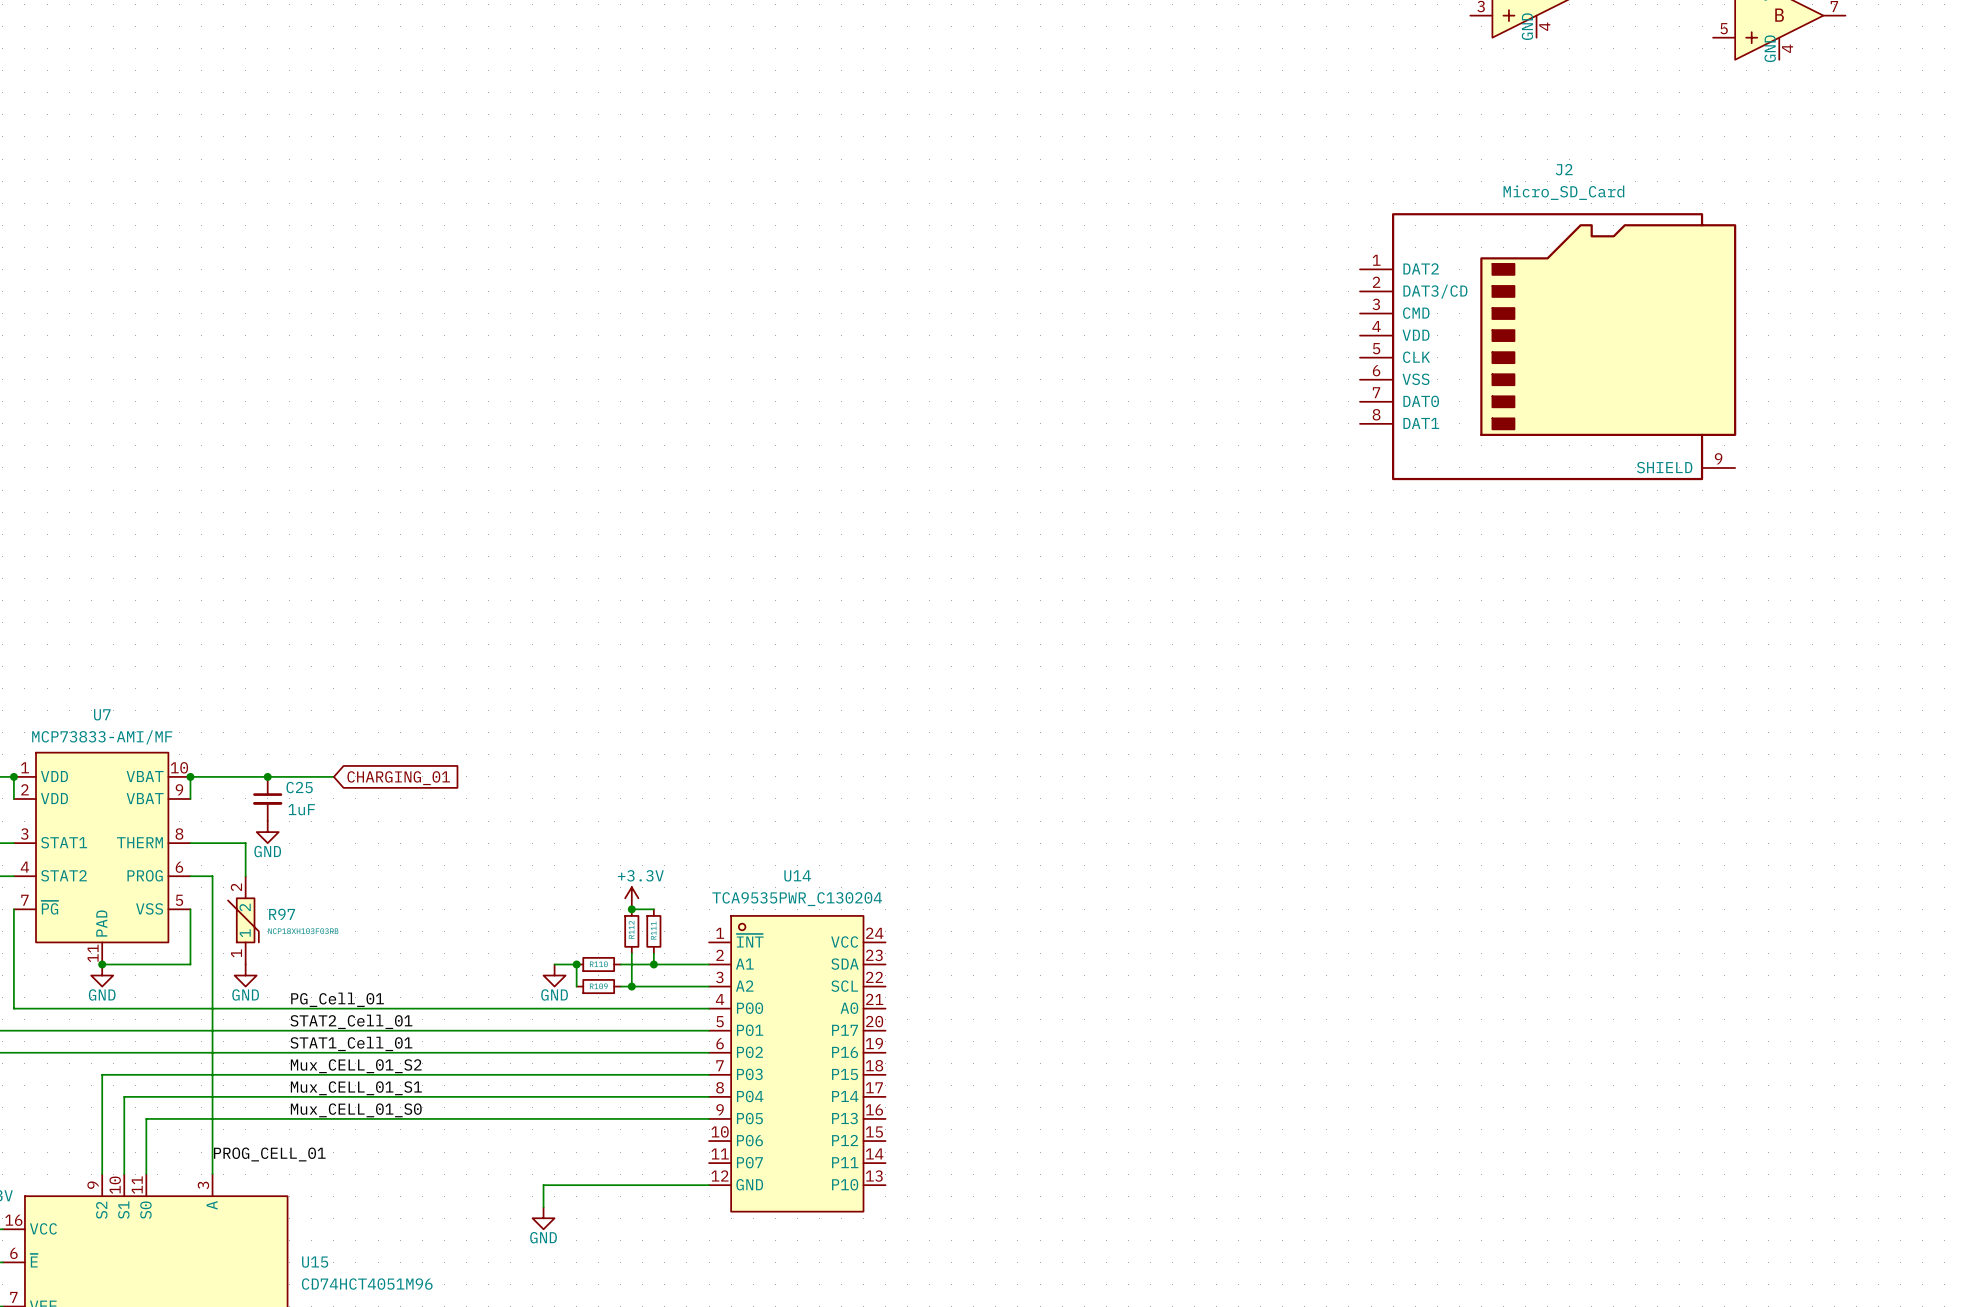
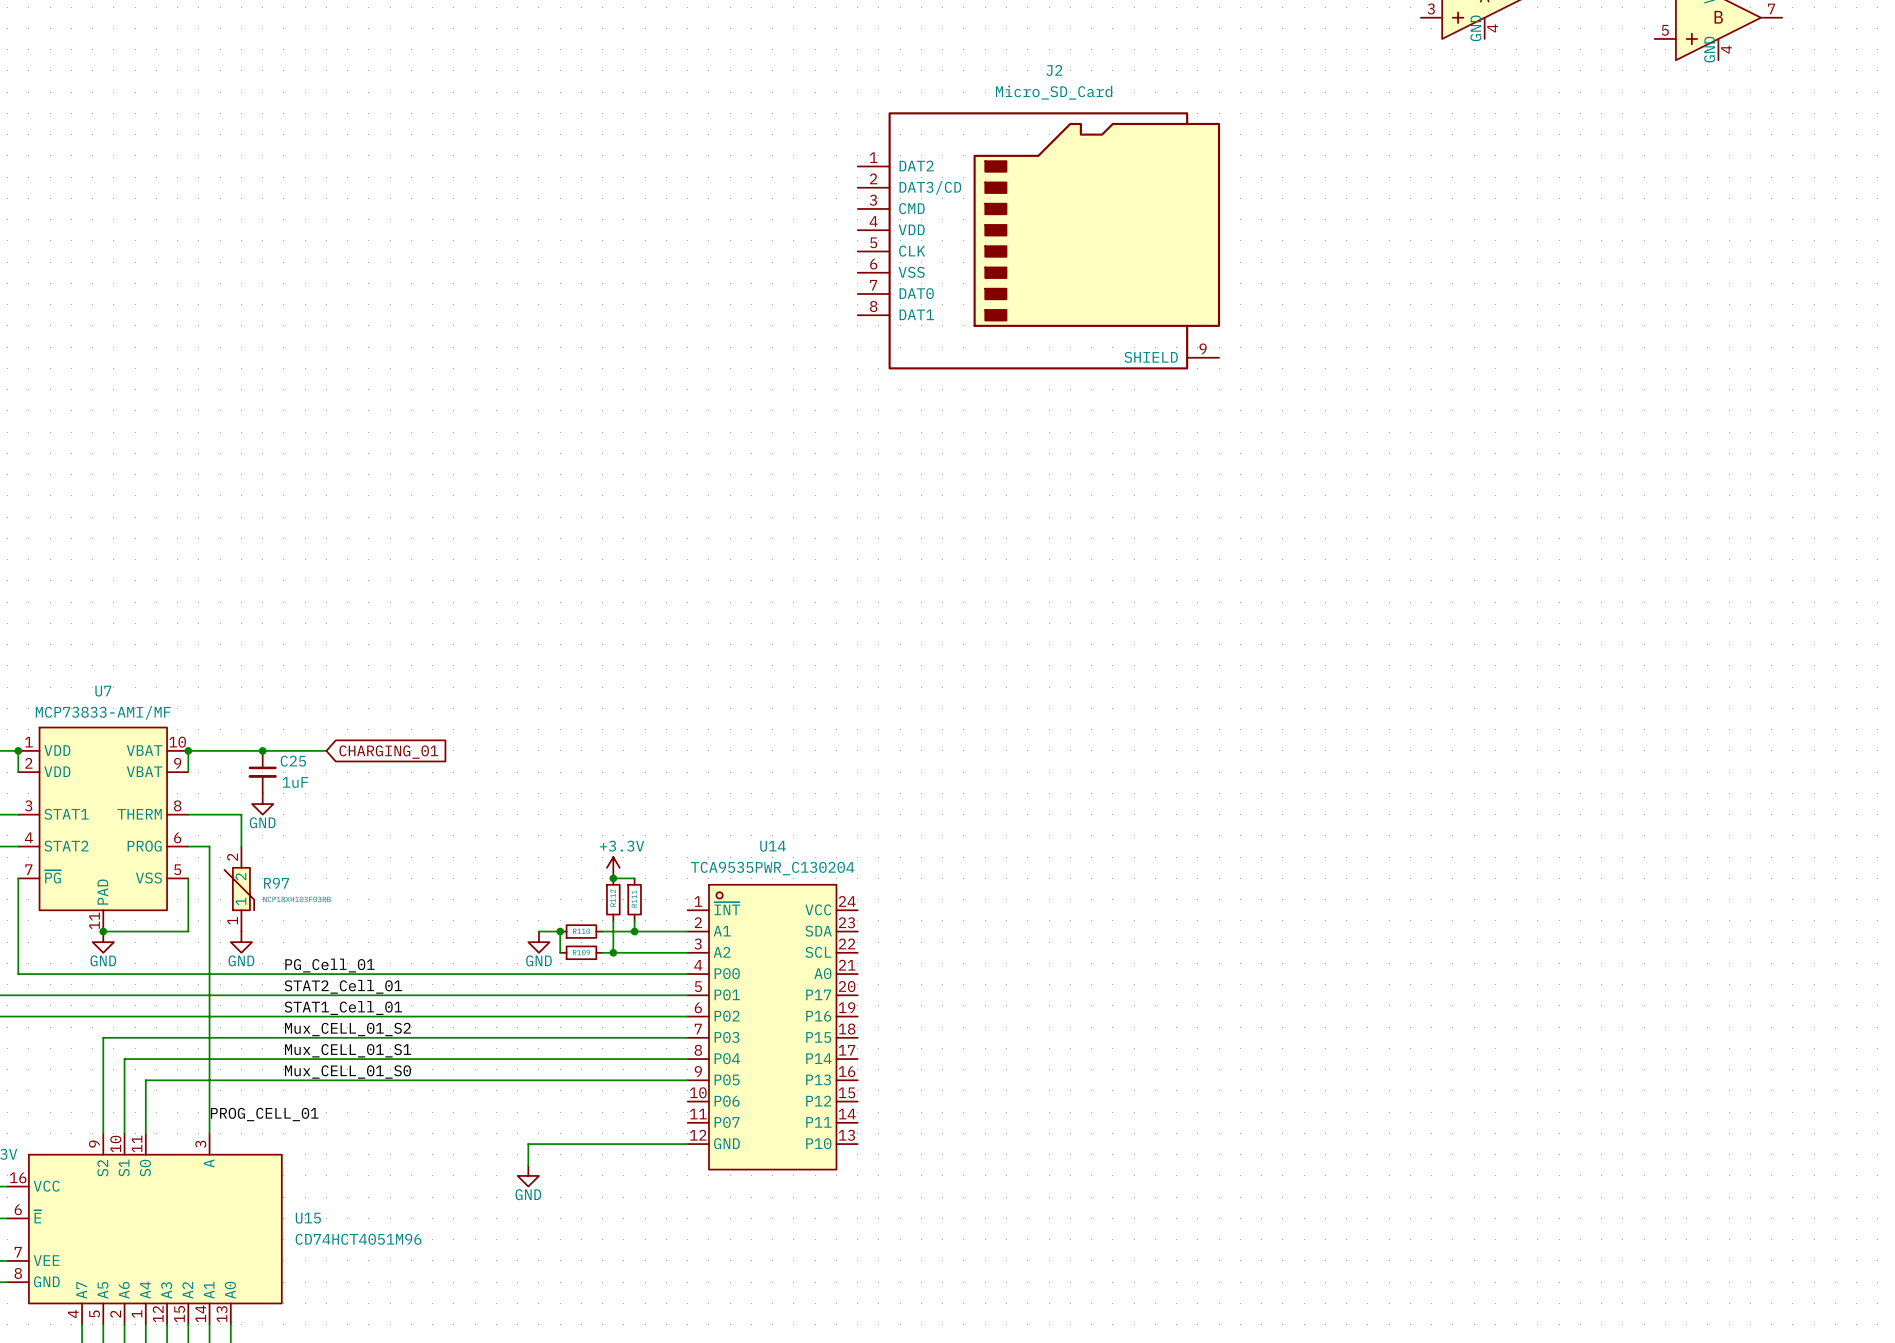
J2 position: (1548, 346) -> (1038, 240)

